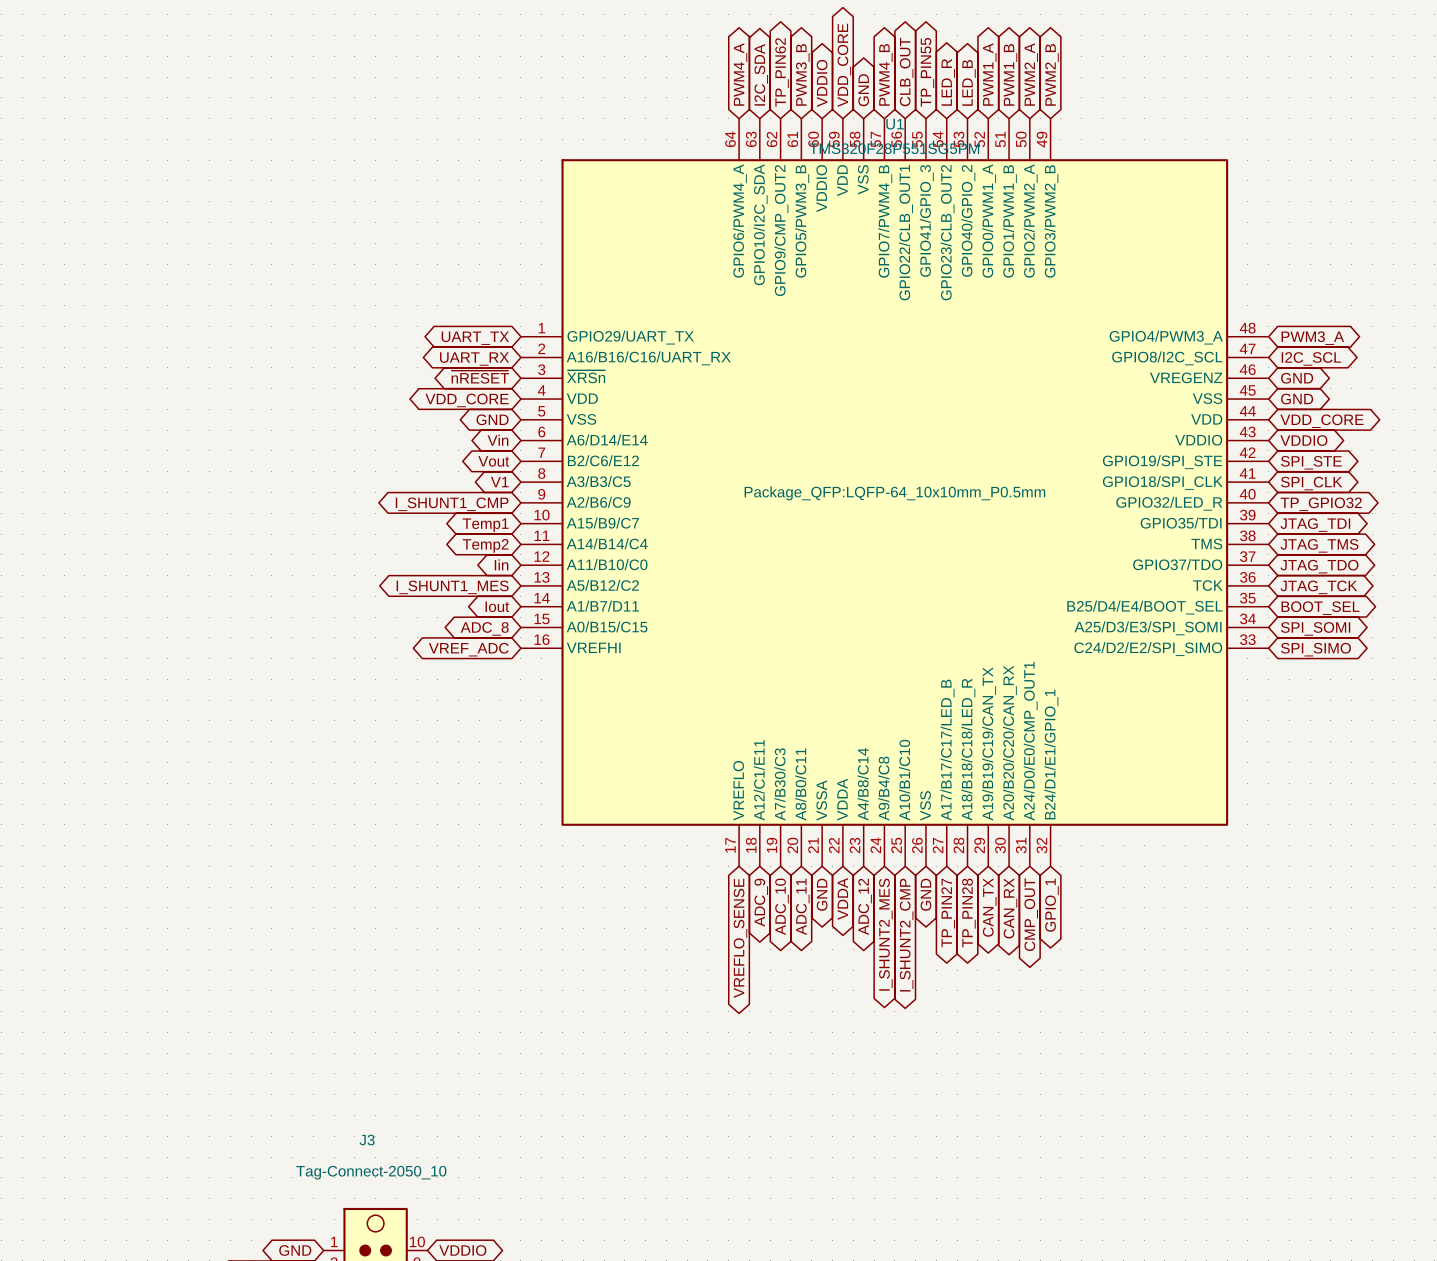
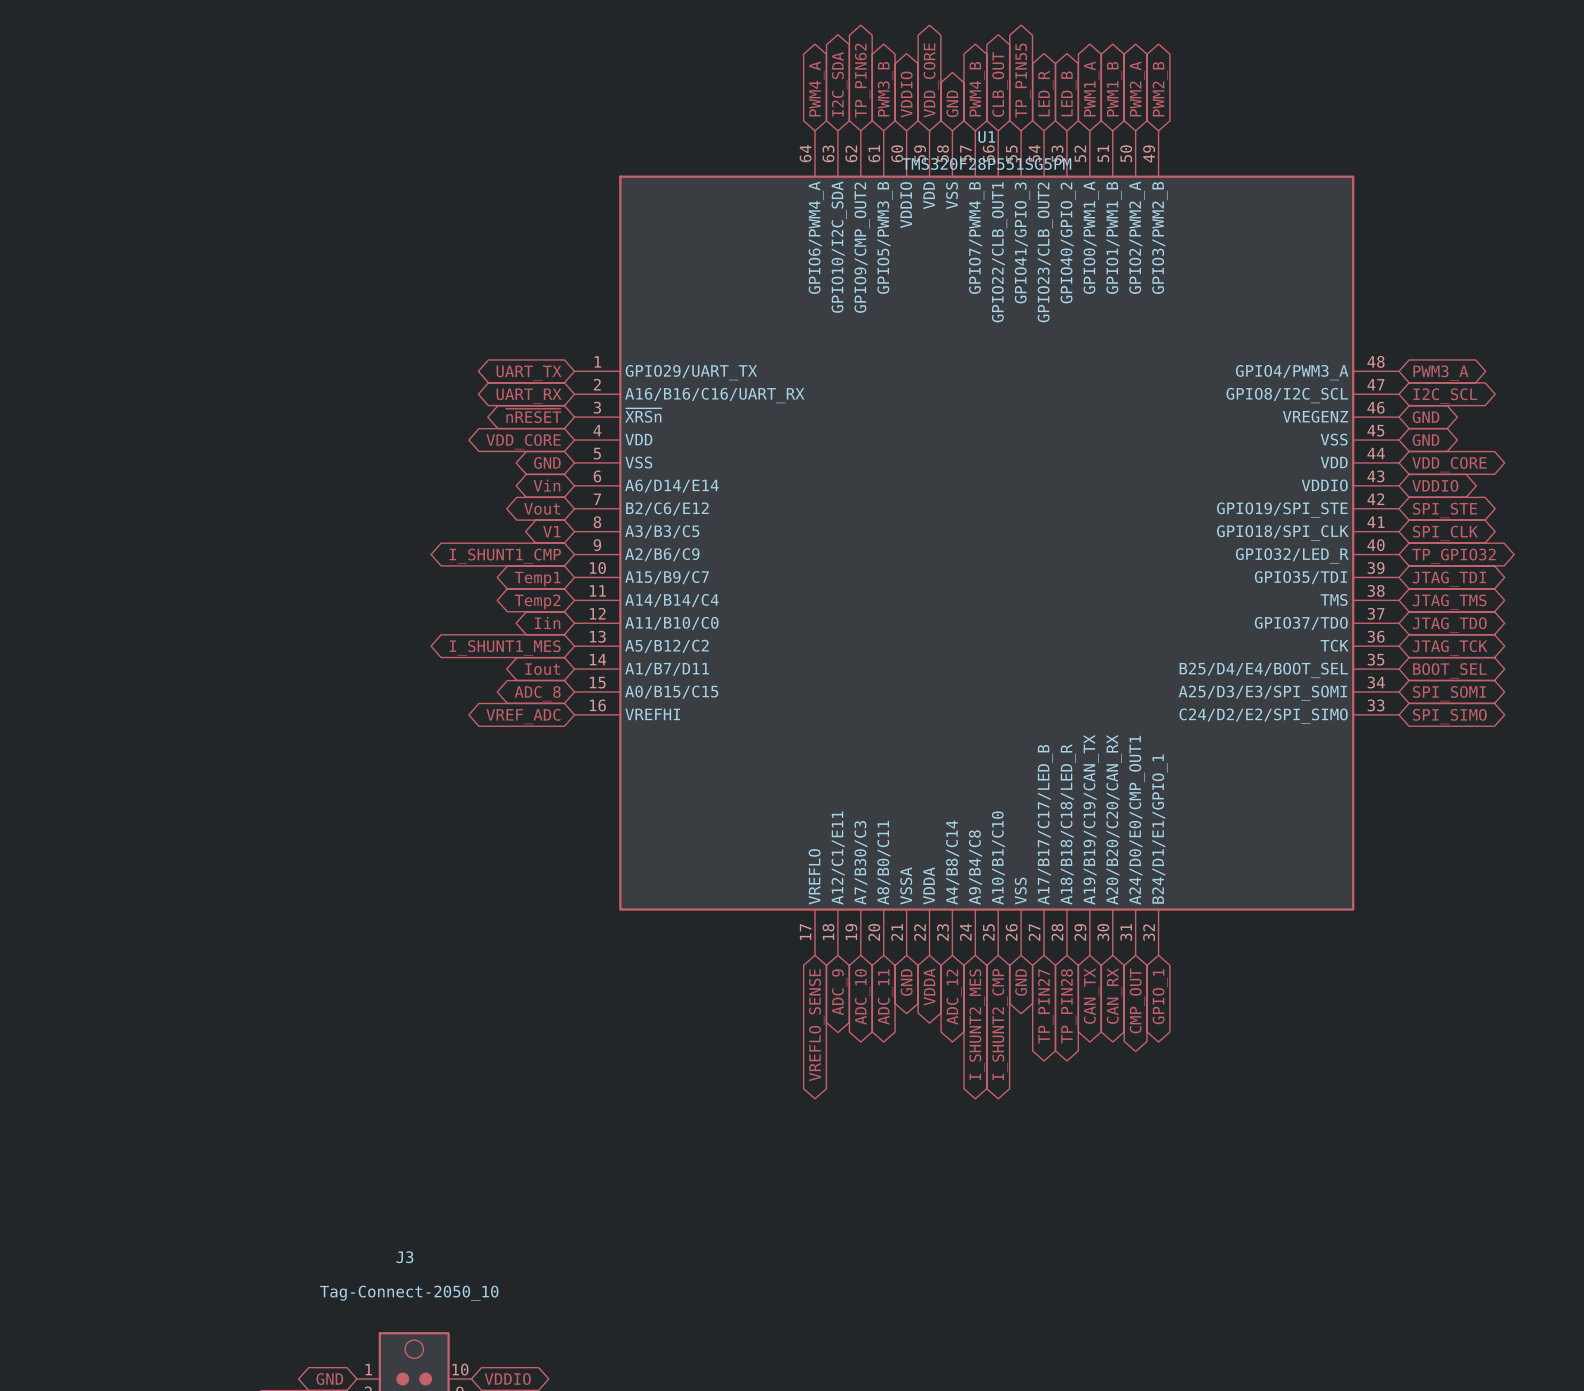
U1 text: Package_QFP:LQFP-64_10x10mm_P0.5mm (894, 493) -> none

